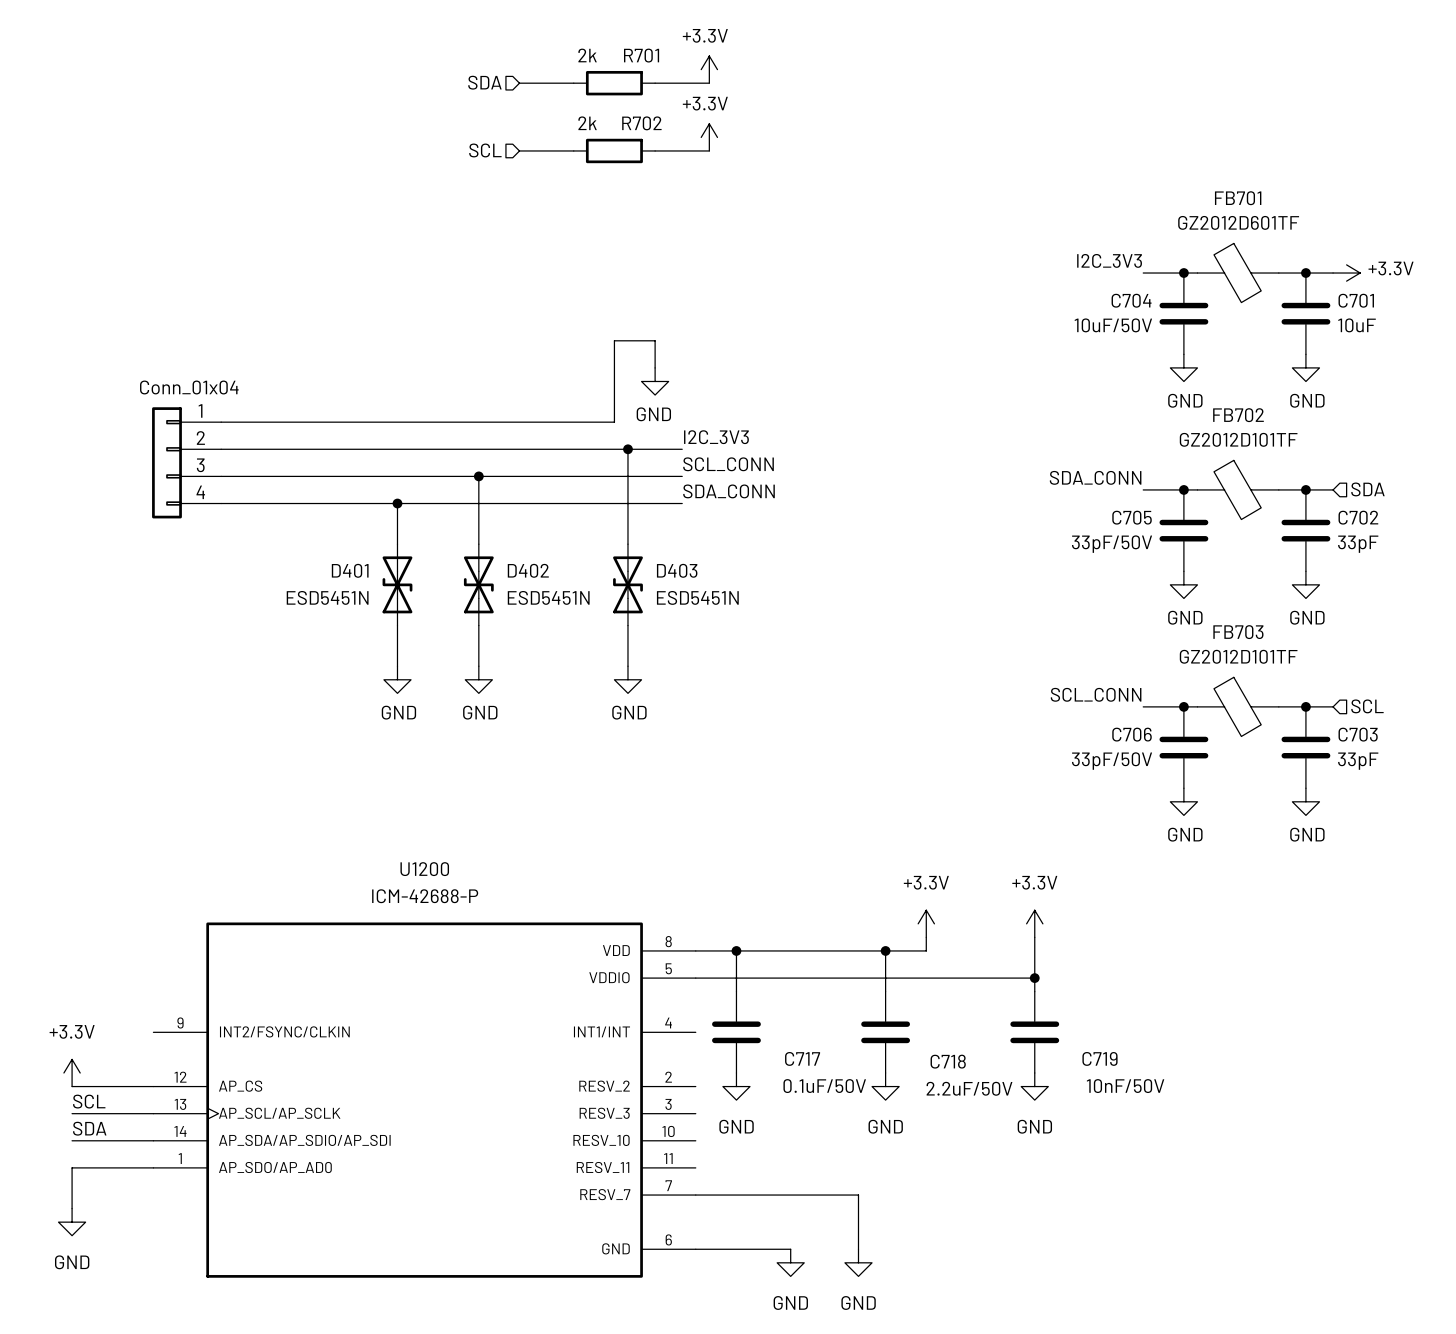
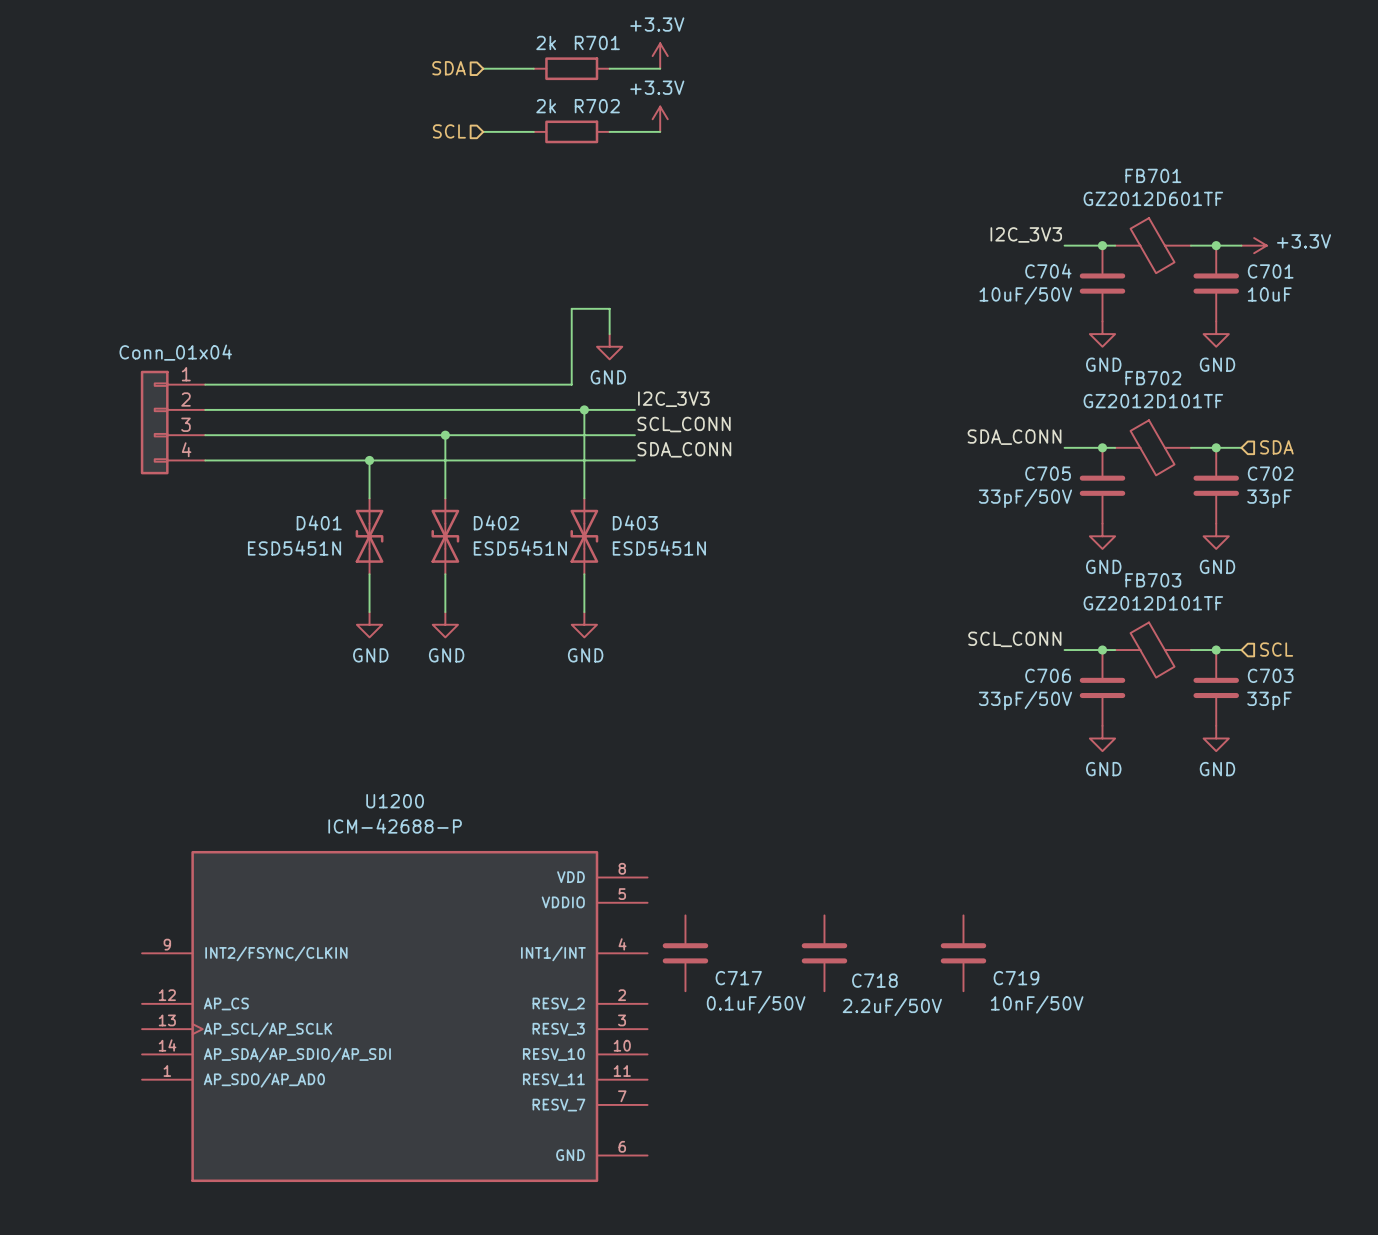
power symbol: +3.3V (926, 923) -> none
power symbol: +3.3V (1034, 923) -> none
wire: (926, 937) (926, 950) (695, 950) -> none
wire: (1034, 937) (1034, 991) -> none
wire: (736, 950) (736, 991) -> none
junction: (736, 950) -> none
wire: (885, 950) (885, 991) -> none
junction: (885, 950) -> none
wire: (695, 978) (1034, 978) -> none
junction: (1034, 978) -> none
power symbol: +3.3V (72, 1072) -> none
wire: (72, 1086) (153, 1086) -> none
power symbol: GND (736, 1086) -> none
power symbol: GND (885, 1086) -> none
power symbol: GND (1034, 1086) -> none
label: SCL (89, 1101) -> none
wire: (72, 1113) (153, 1113) -> none
label: SDA (89, 1128) -> none
wire: (72, 1140) (153, 1140) -> none
wire: (153, 1167) (72, 1167) (72, 1208) -> none
wire: (695, 1195) (858, 1195) (858, 1249) -> none
power symbol: GND (72, 1222) -> none
wire: (695, 1249) (790, 1249) -> none
power symbol: GND (790, 1262) -> none
power symbol: GND (858, 1262) -> none

